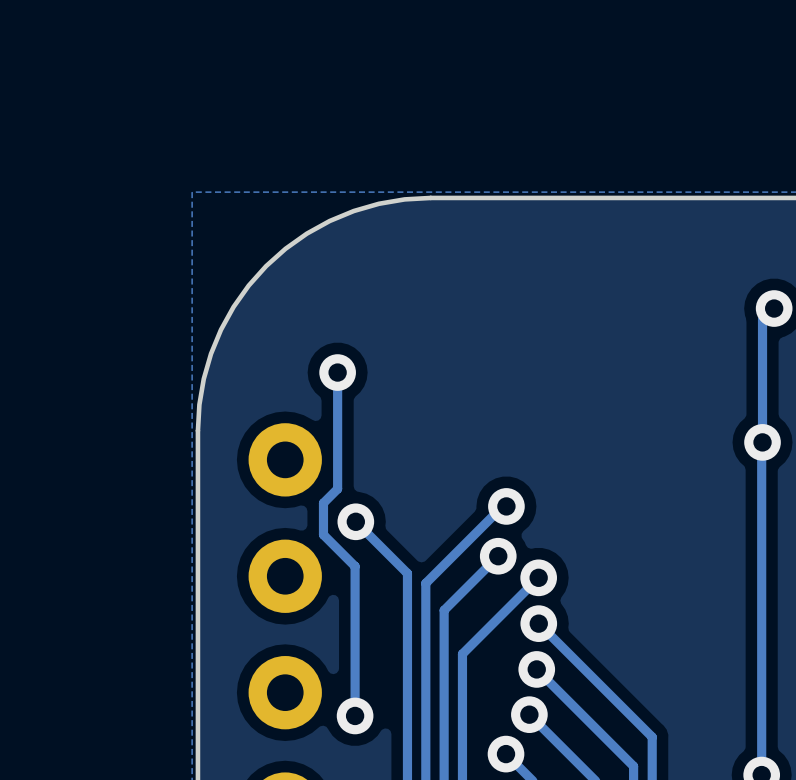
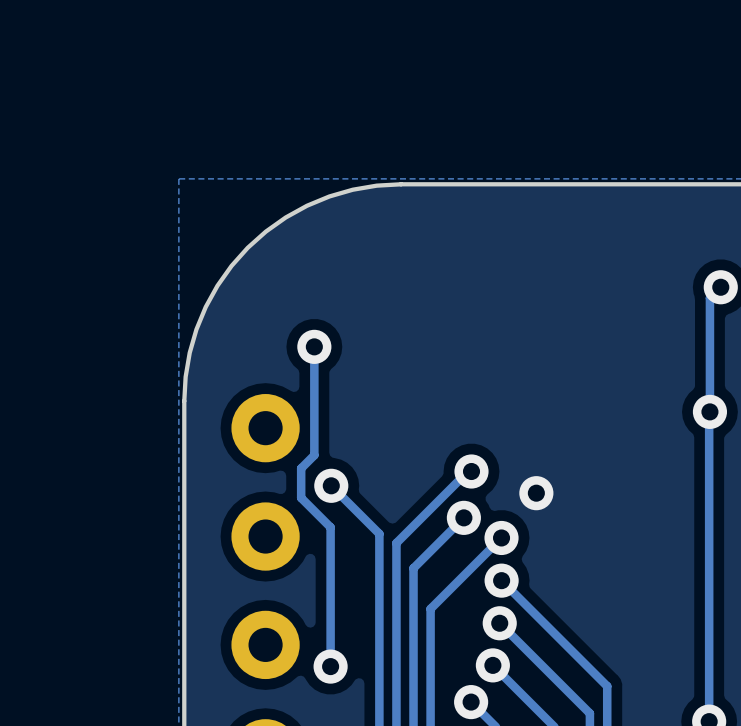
via: none -> (536, 493)

